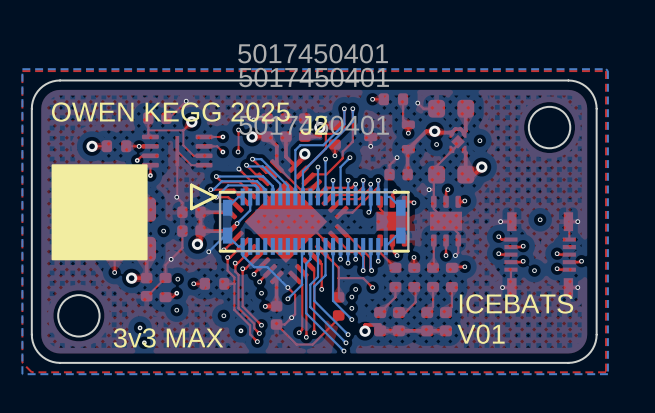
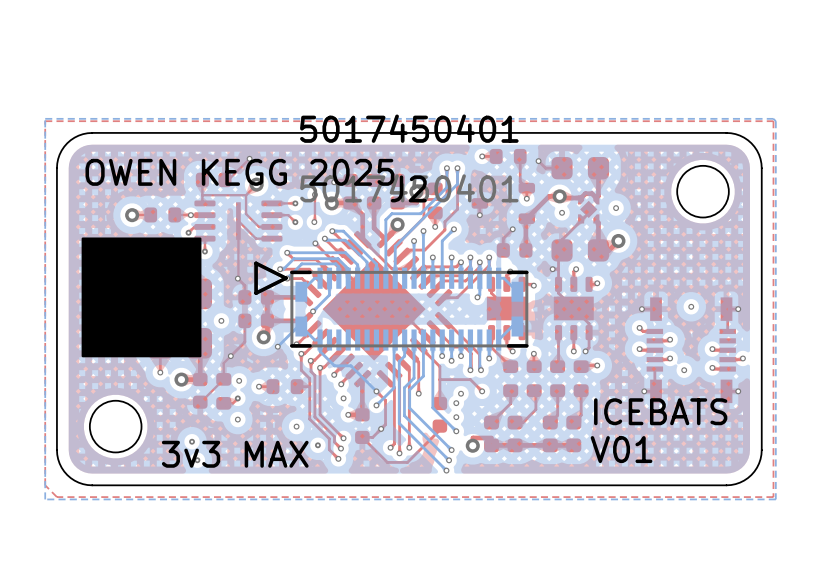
J2 footprint: [189, 183, 410, 255] -> [254, 261, 529, 351]

